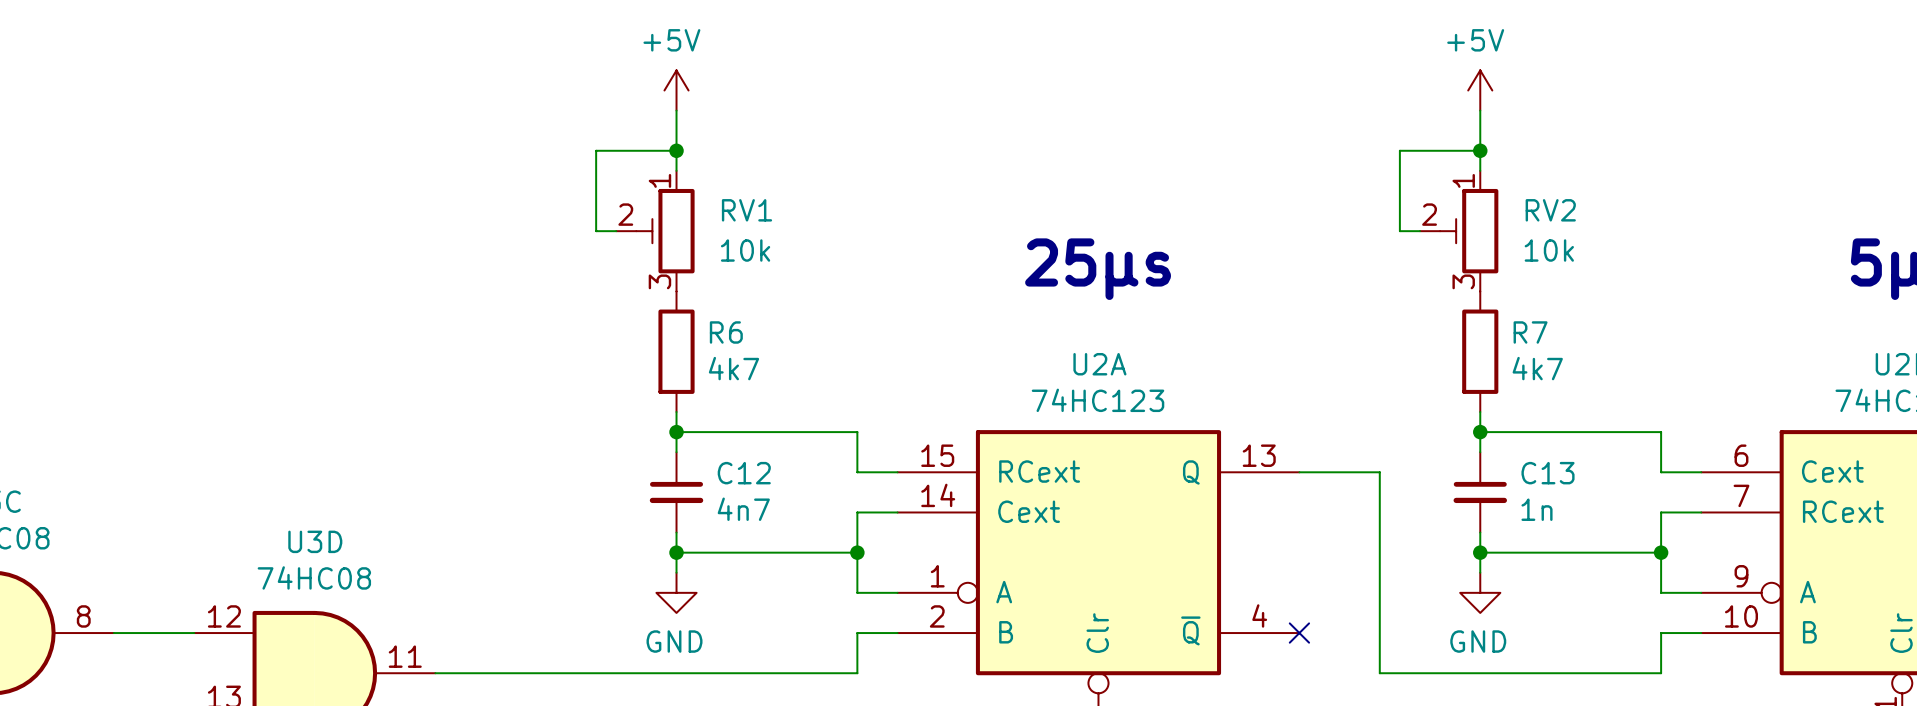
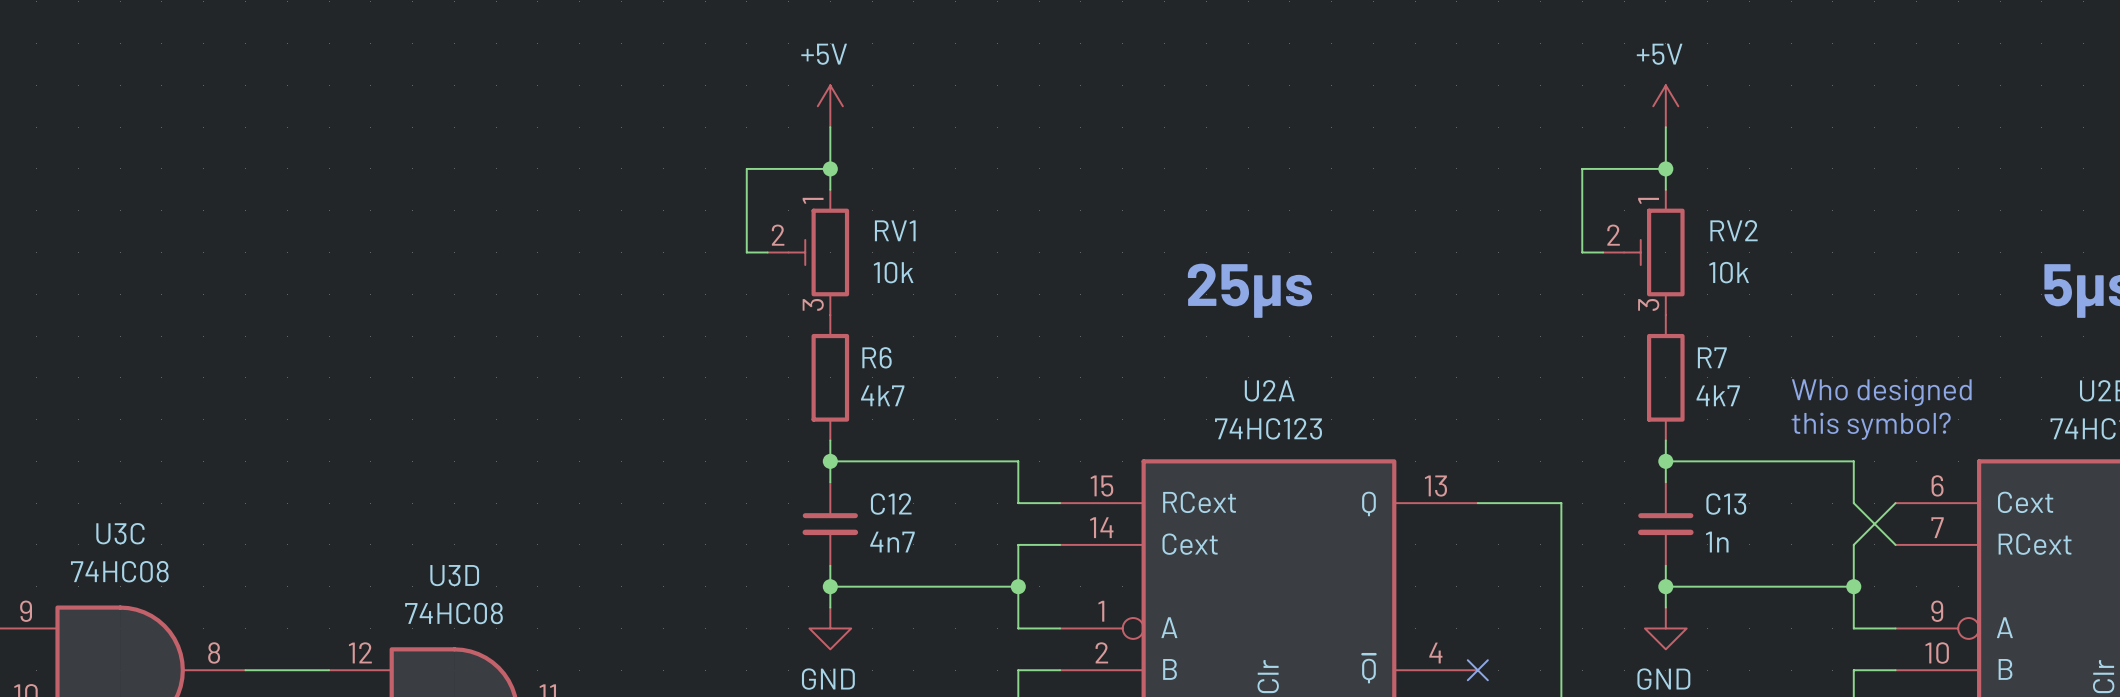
text: none -> Who designed (1881, 392)
text: none -> this symbol? (1871, 426)
wire: (1661, 472) (1701, 472) -> (1853, 503) (1895, 544)
wire: (1661, 512) (1701, 512) -> (1853, 544) (1895, 503)

